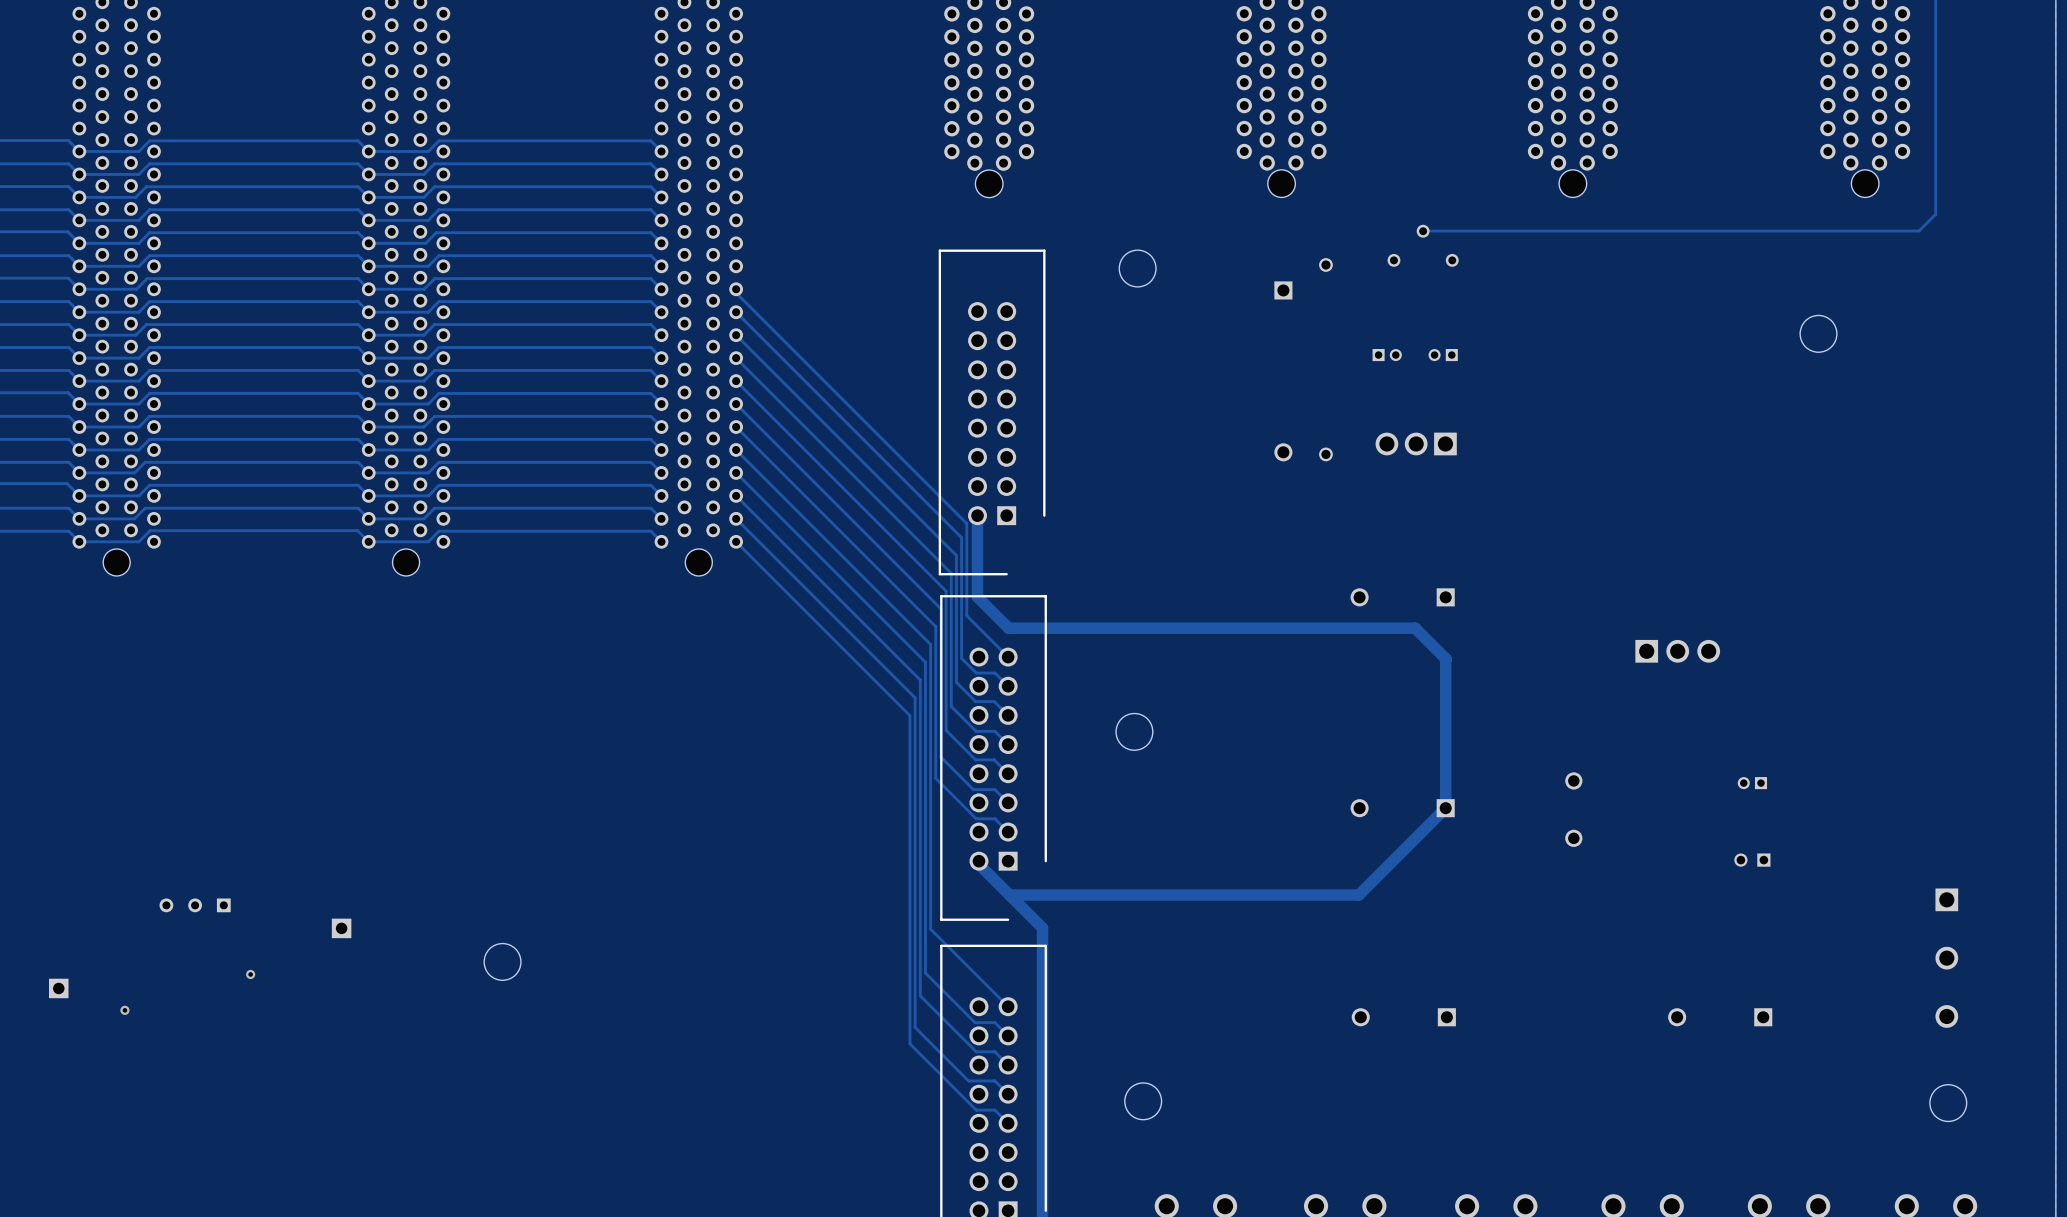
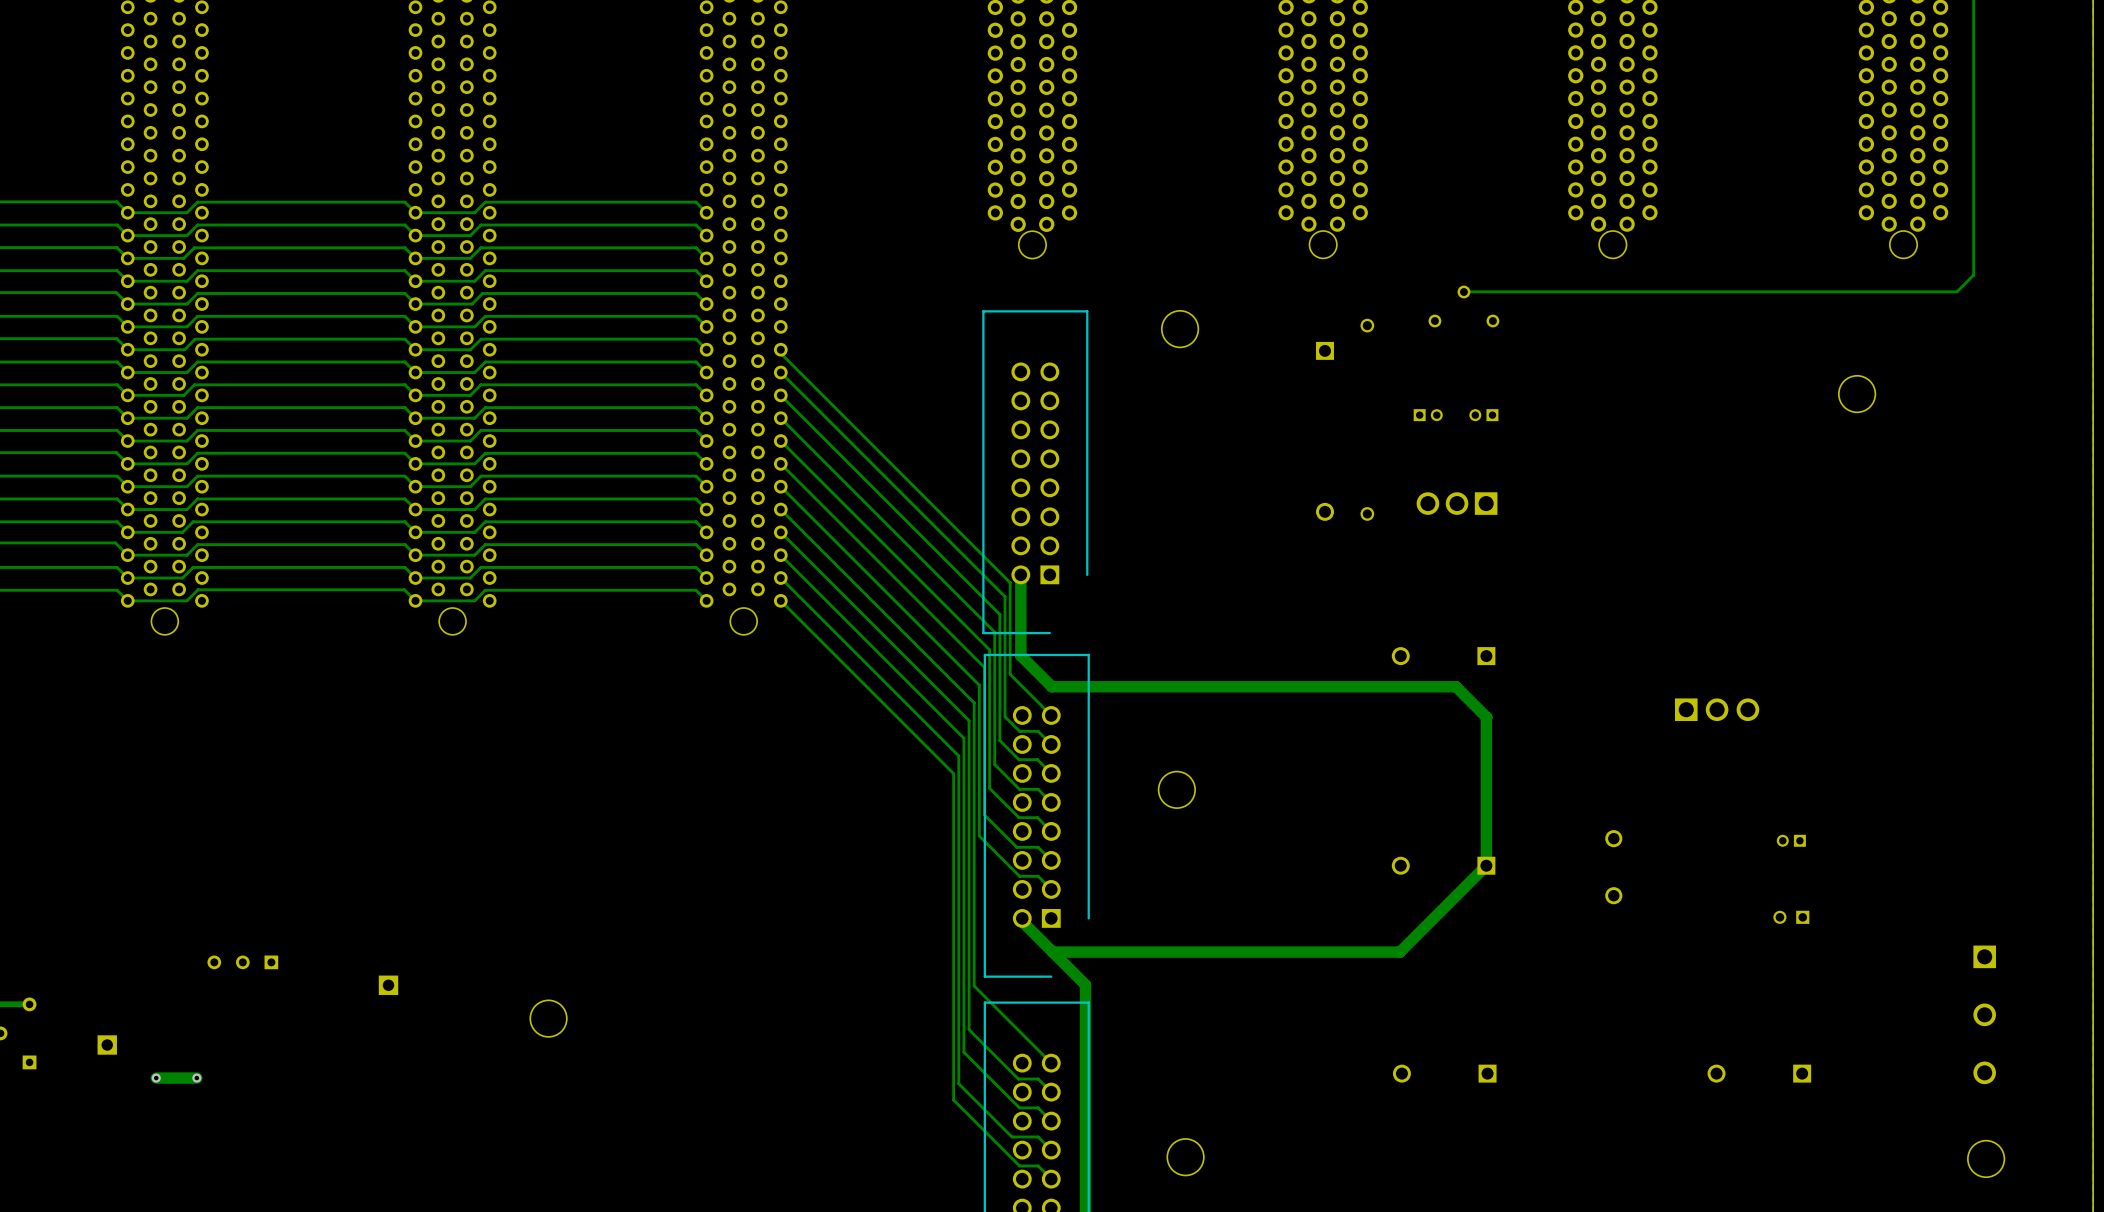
via: (250, 974) -> none
via: (124, 1010) -> none
via: none -> (156, 1078)
track: none -> (196, 1078) (156, 1078)
via: none -> (196, 1078)

